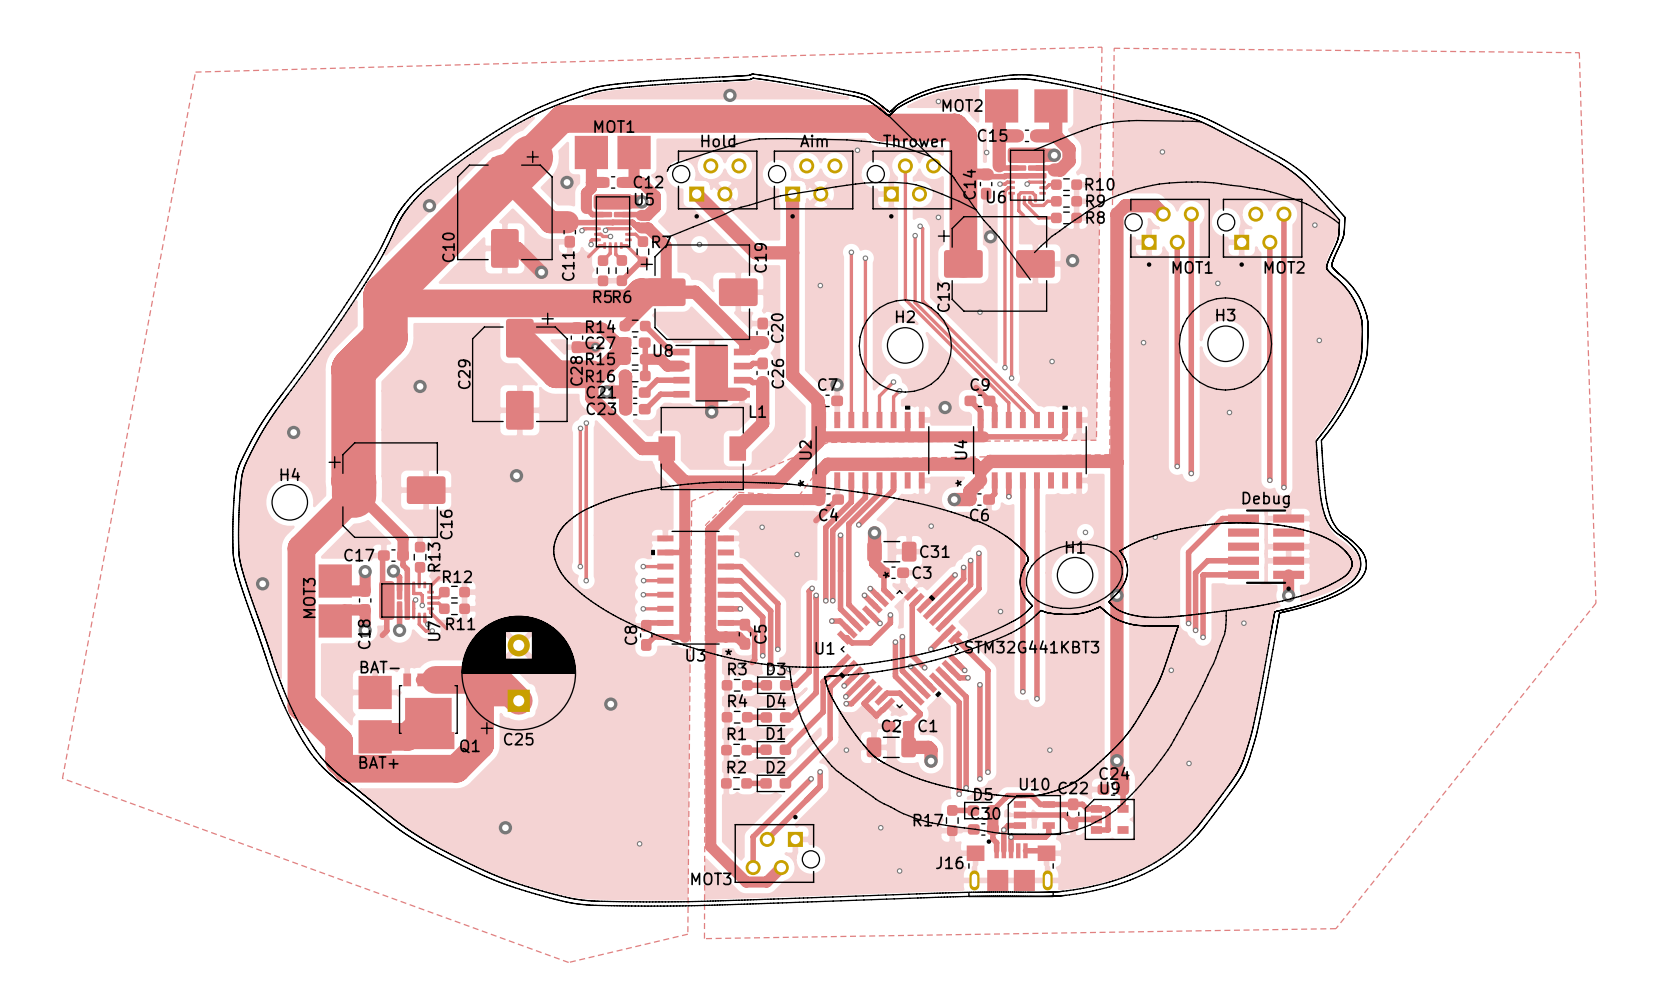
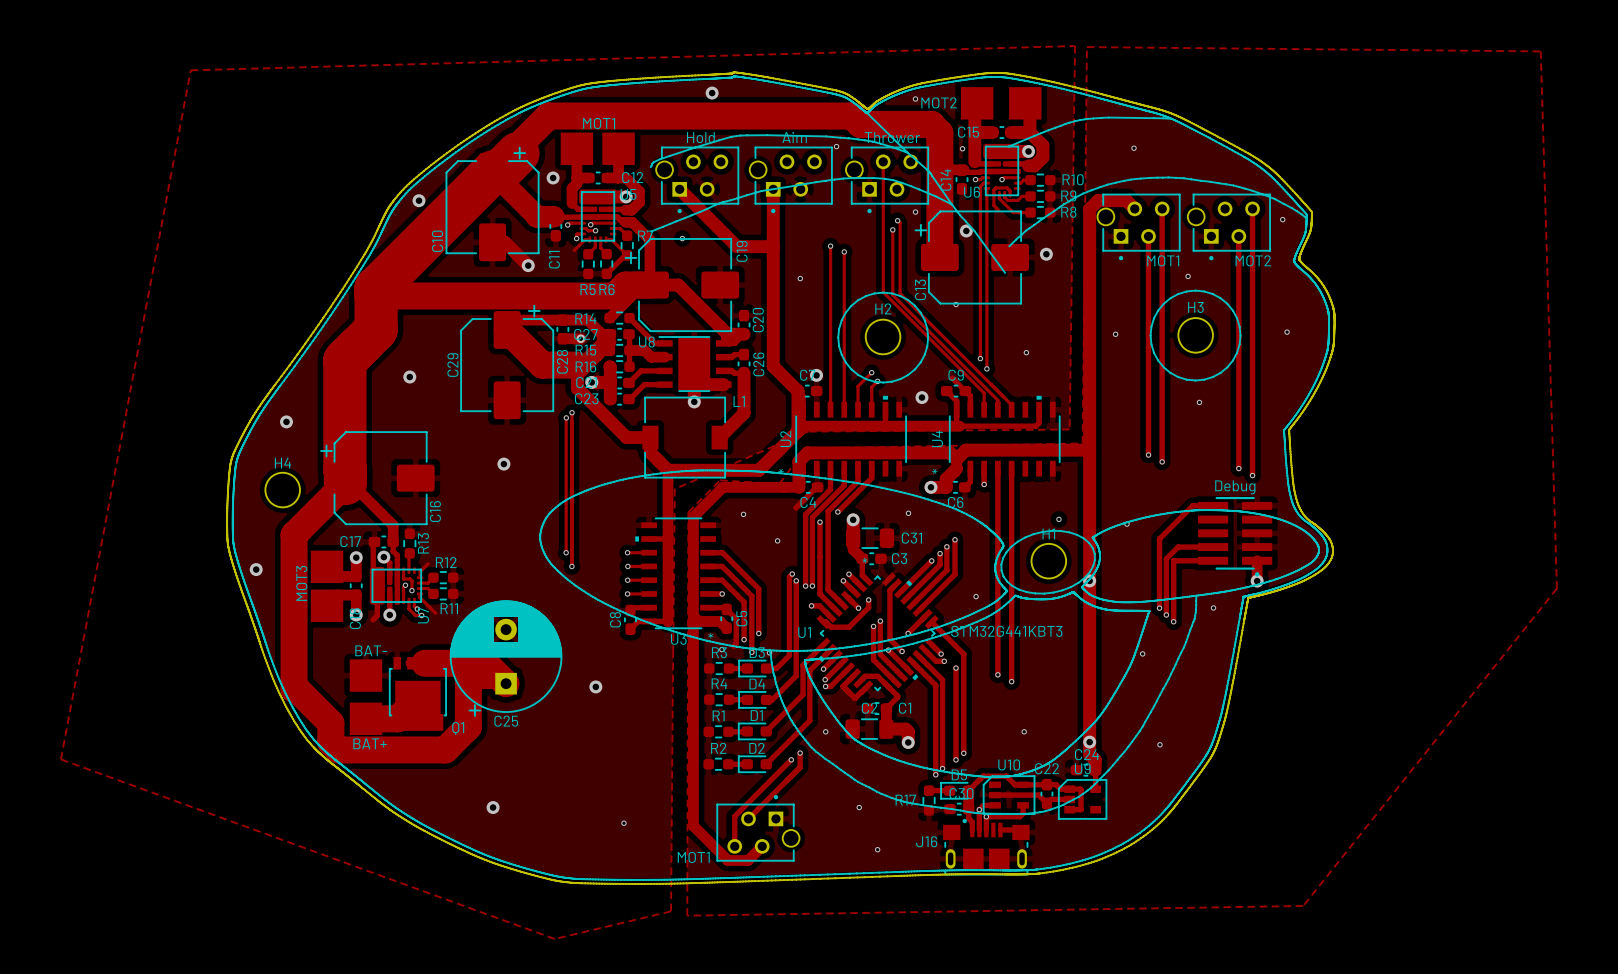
MOT3 name: MOT3 (711, 878) -> MOT1 (693, 857)

